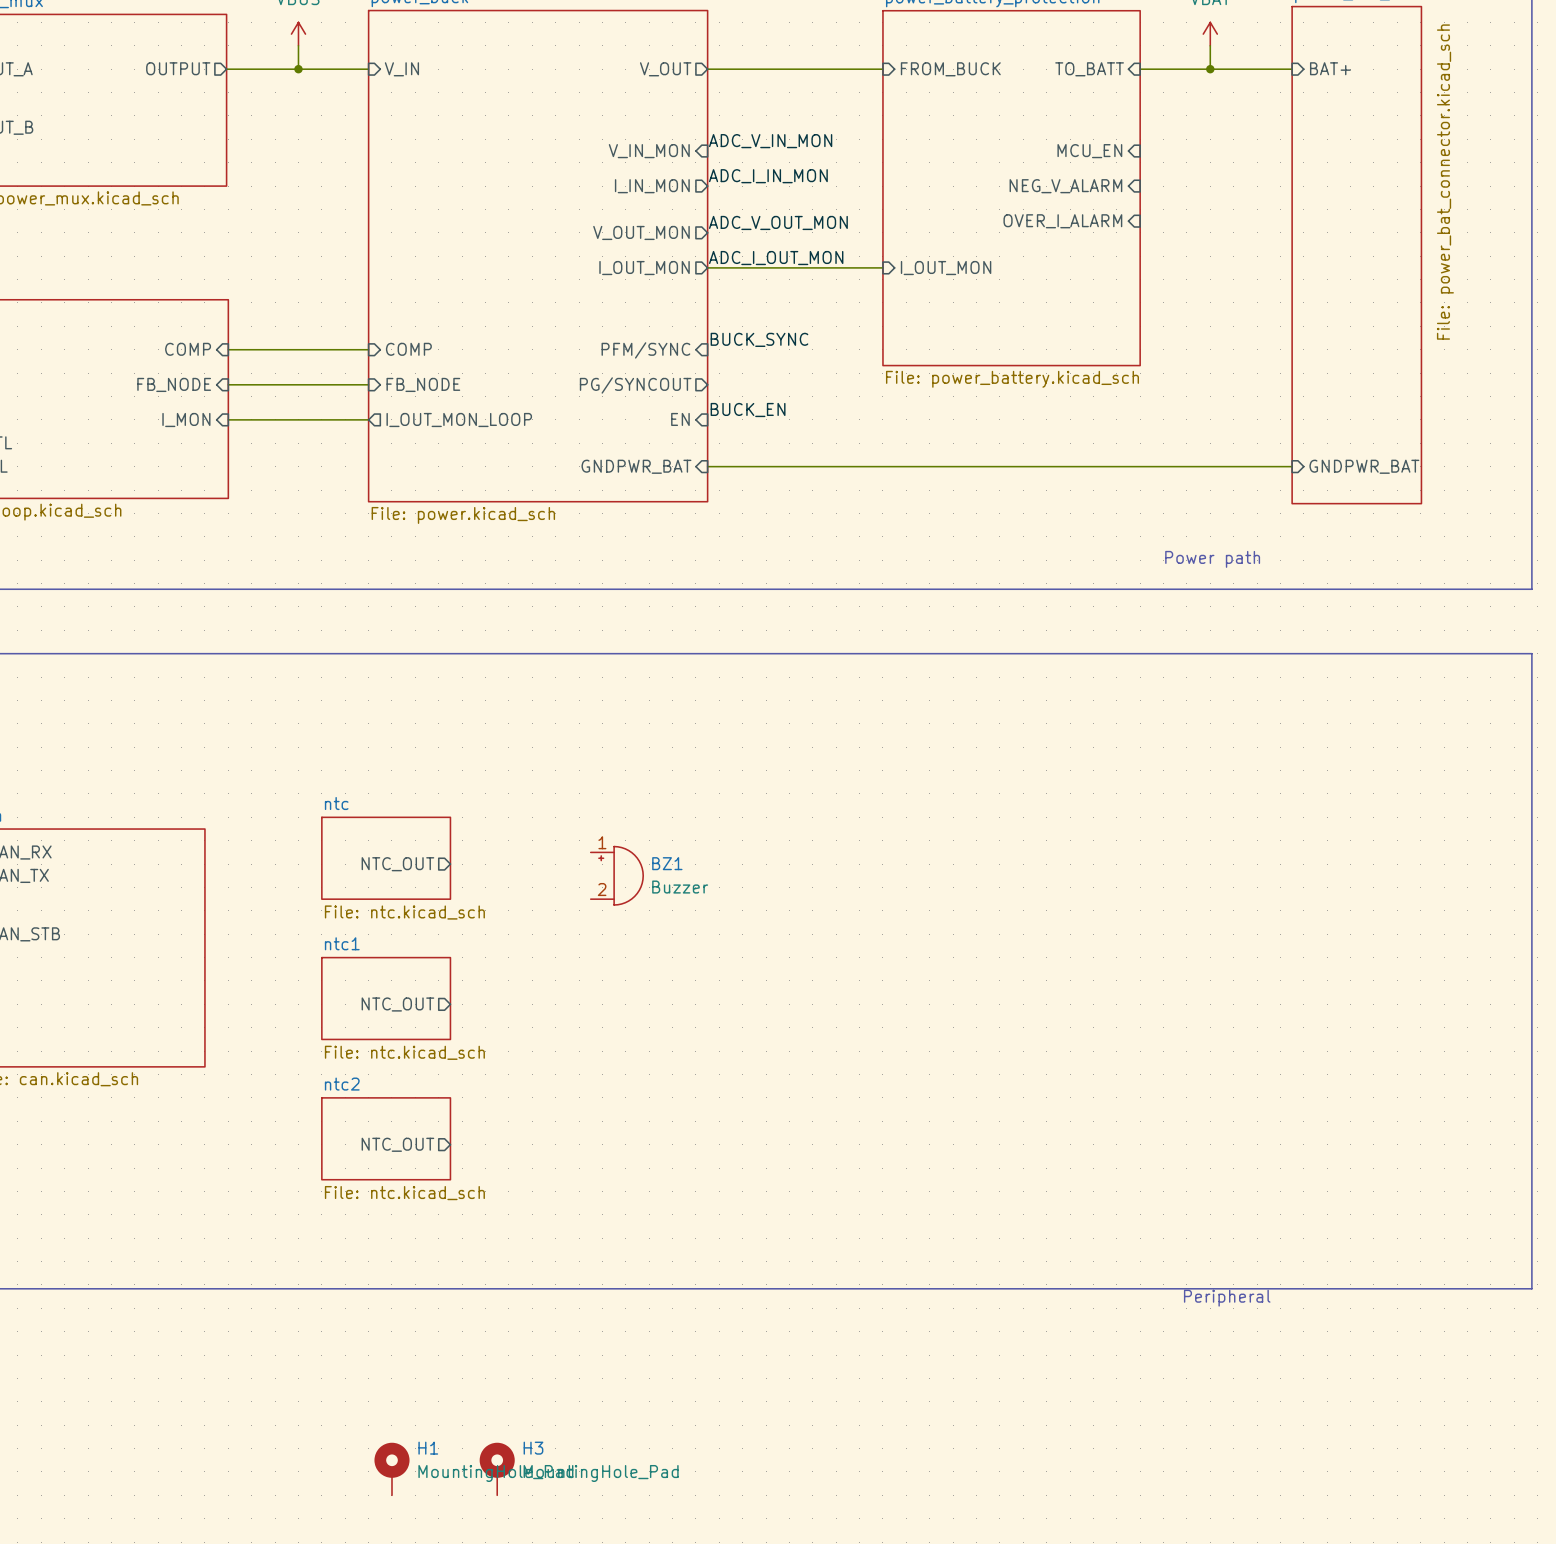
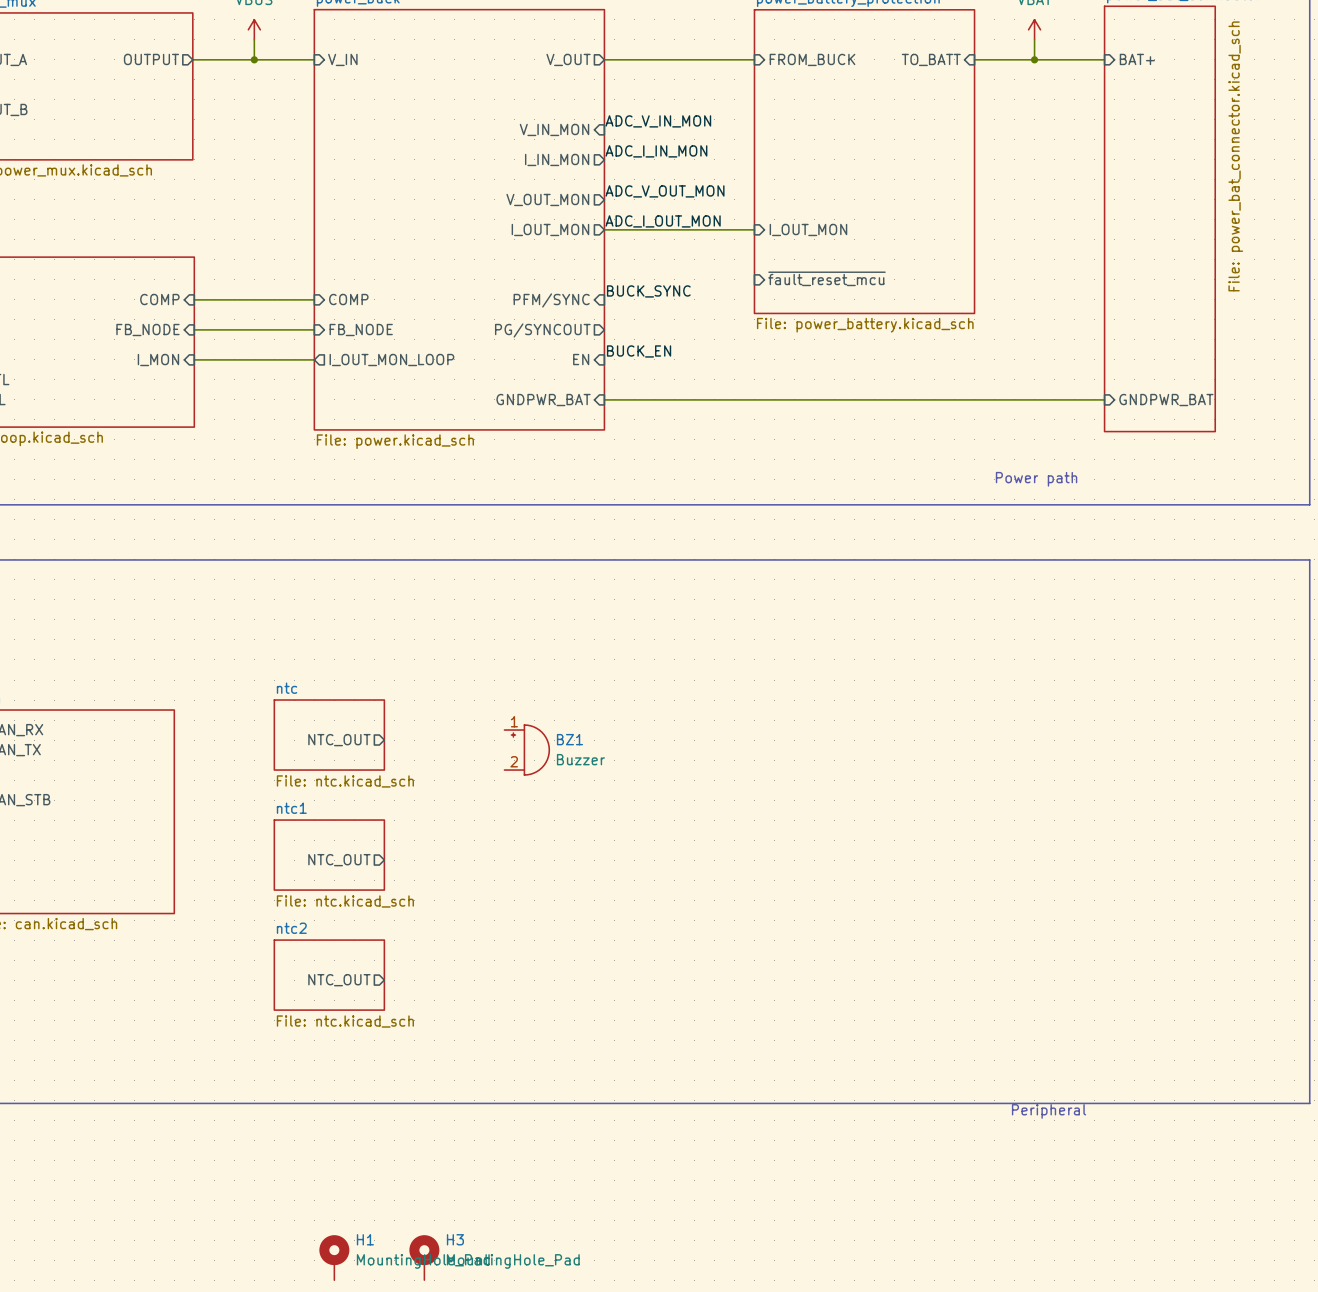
sheet pin: MCU_EN (1089, 151) -> none
sheet pin: NEG_V_ALARM (1065, 186) -> none
sheet pin: OVER_I_ALARM (1062, 221) -> none
sheet pin: none -> ~{fault_reset_mcu} (827, 278)

